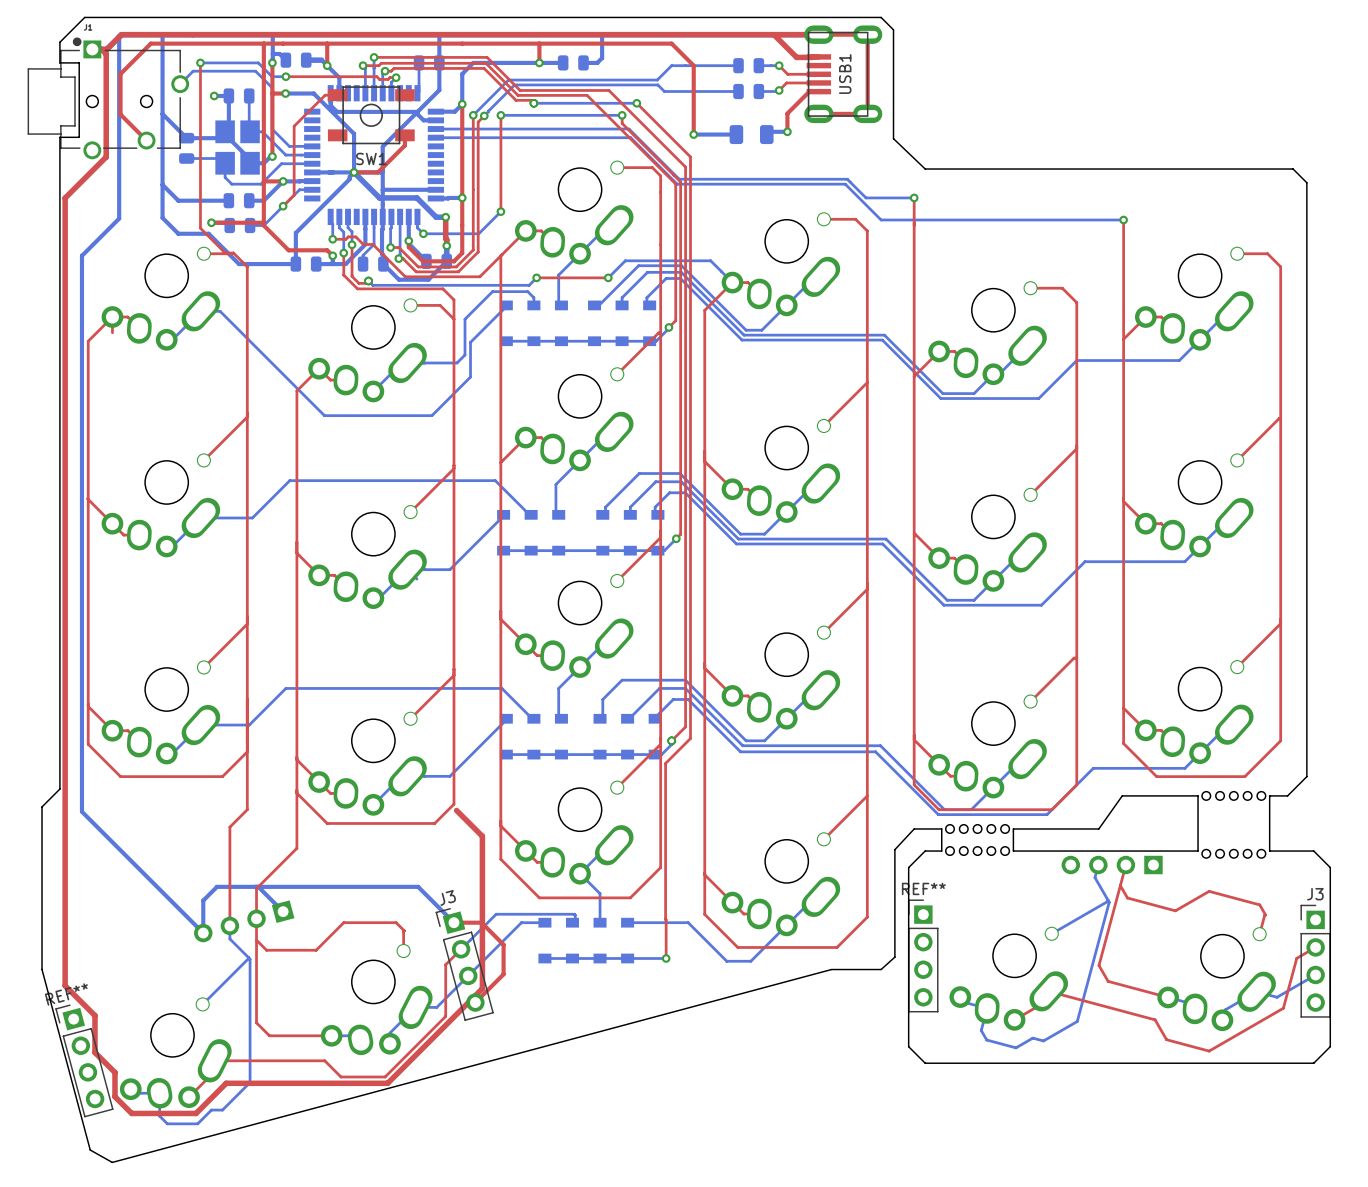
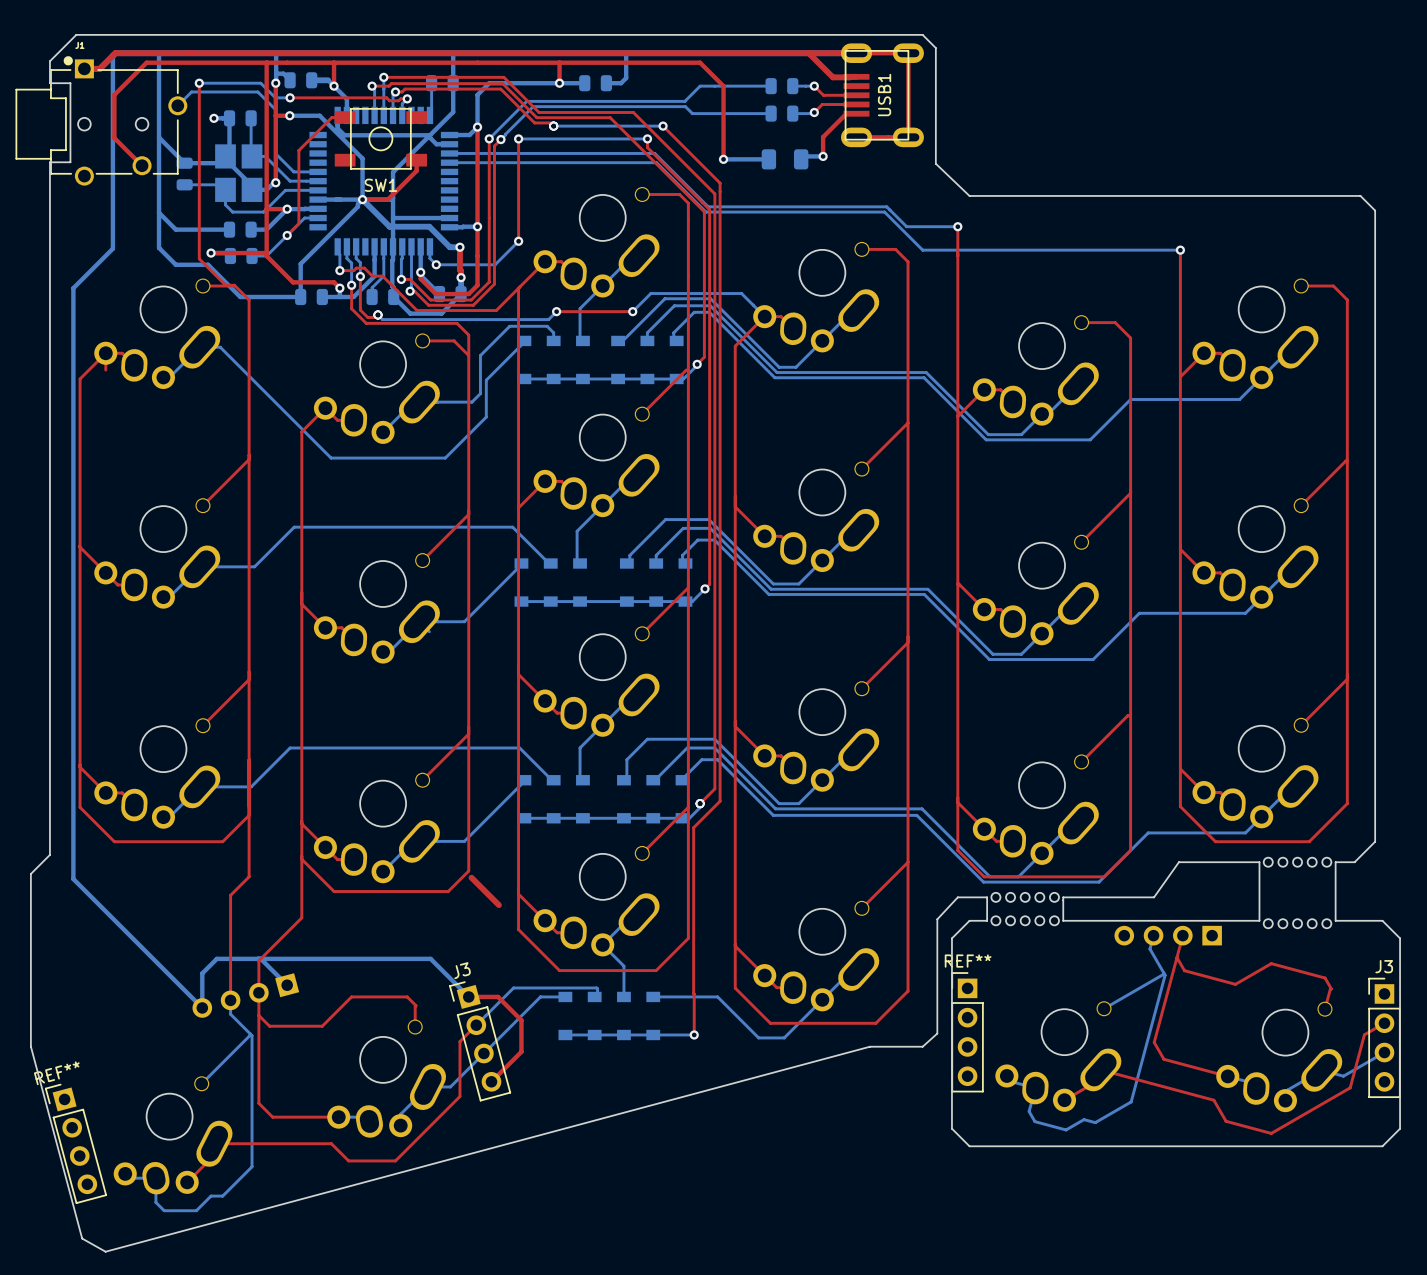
top track: (101, 49) (106, 54) (106, 156) (65, 198) (65, 985) (94, 1015) (94, 1052) (114, 1072) (114, 1096) (131, 1113) (196, 1113) (226, 1083) (387, 1083) (482, 988) (482, 836) -> none

